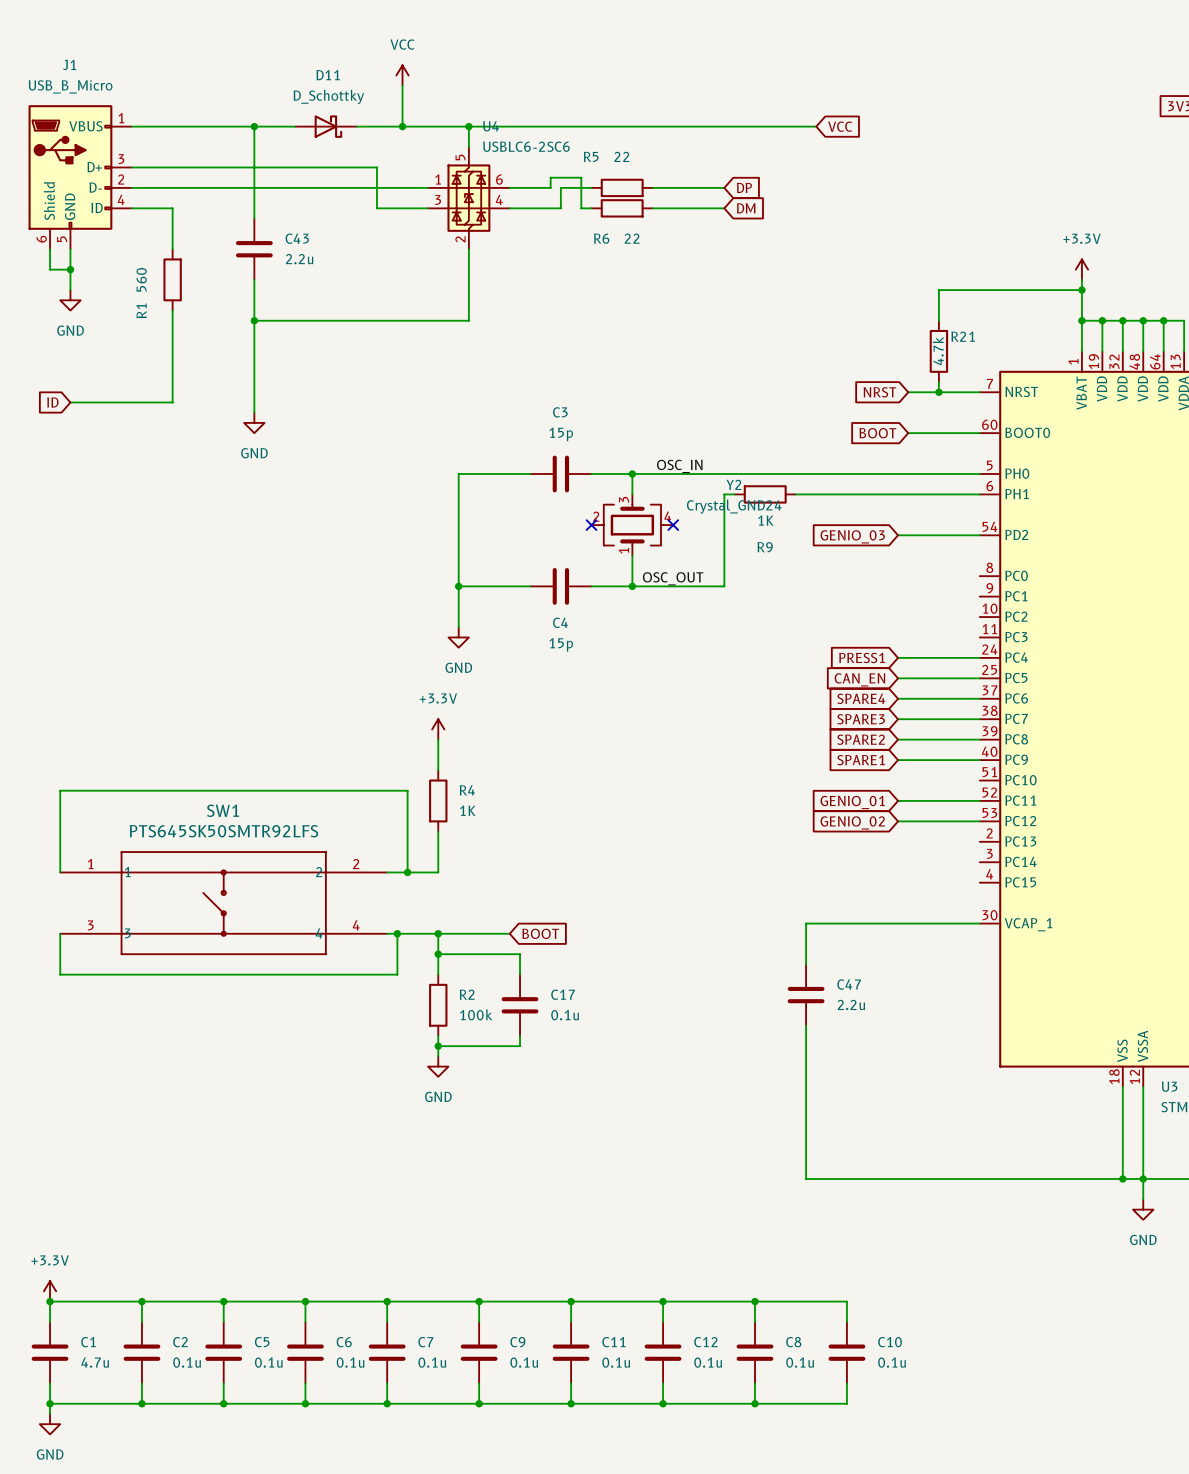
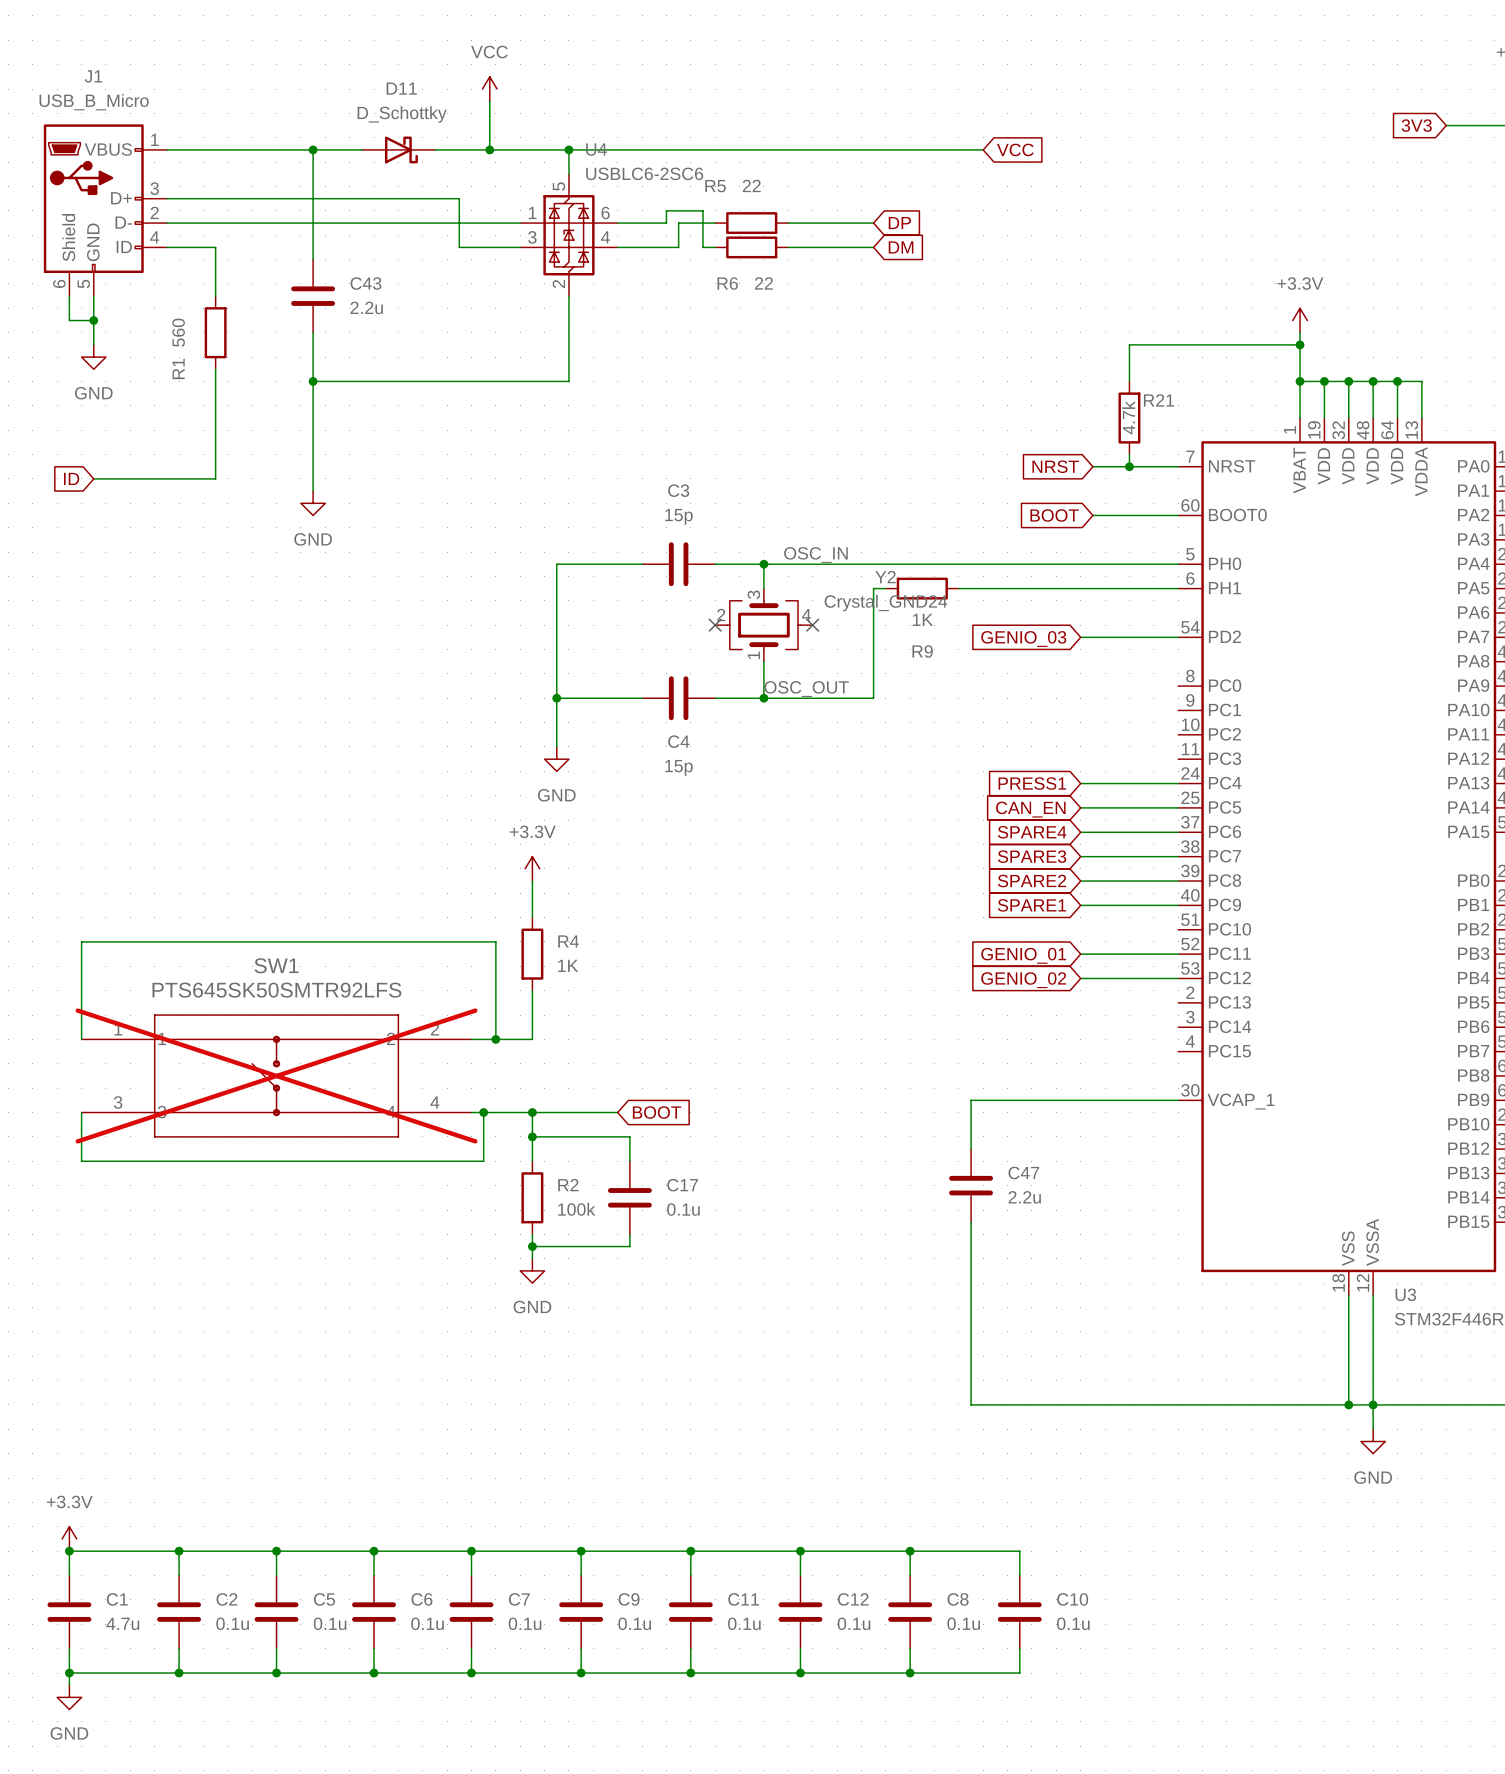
SW1 do-not-place cross: none -> (276, 1075)

